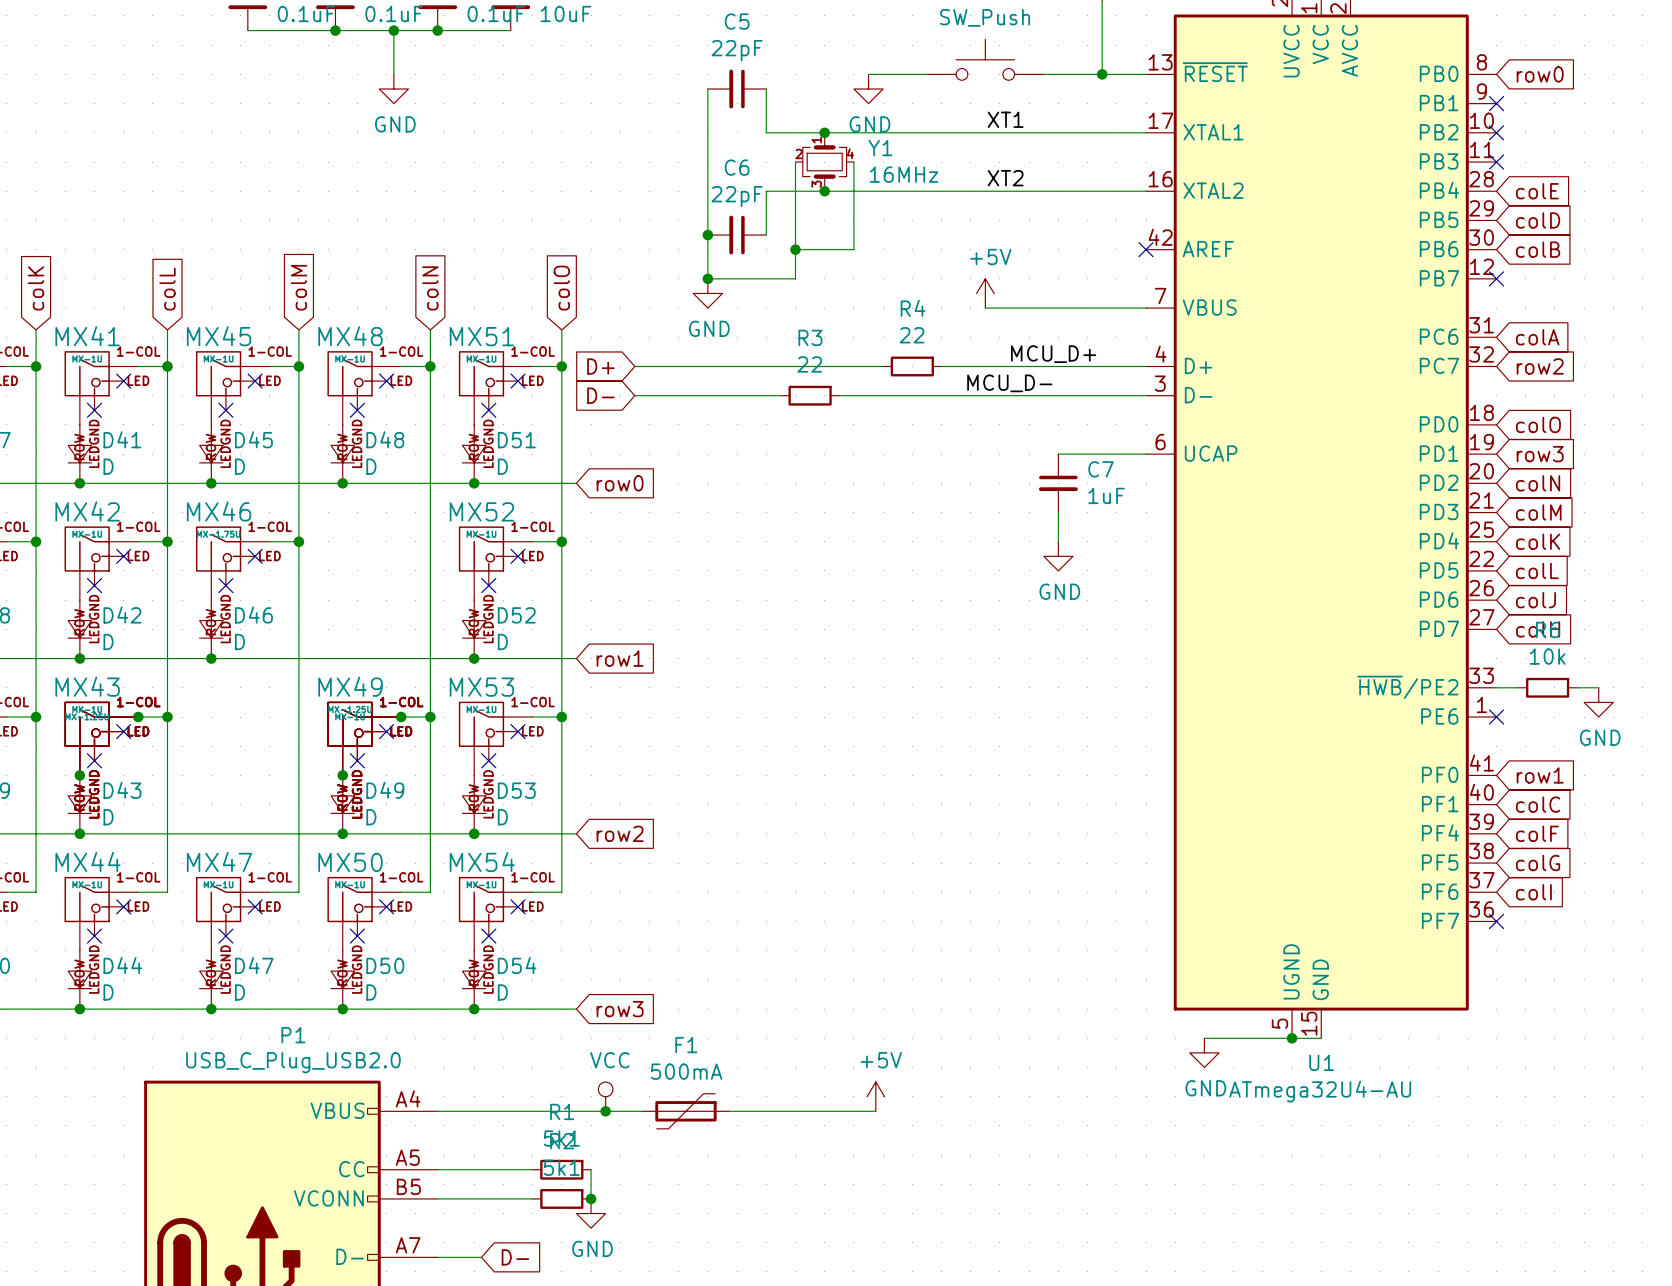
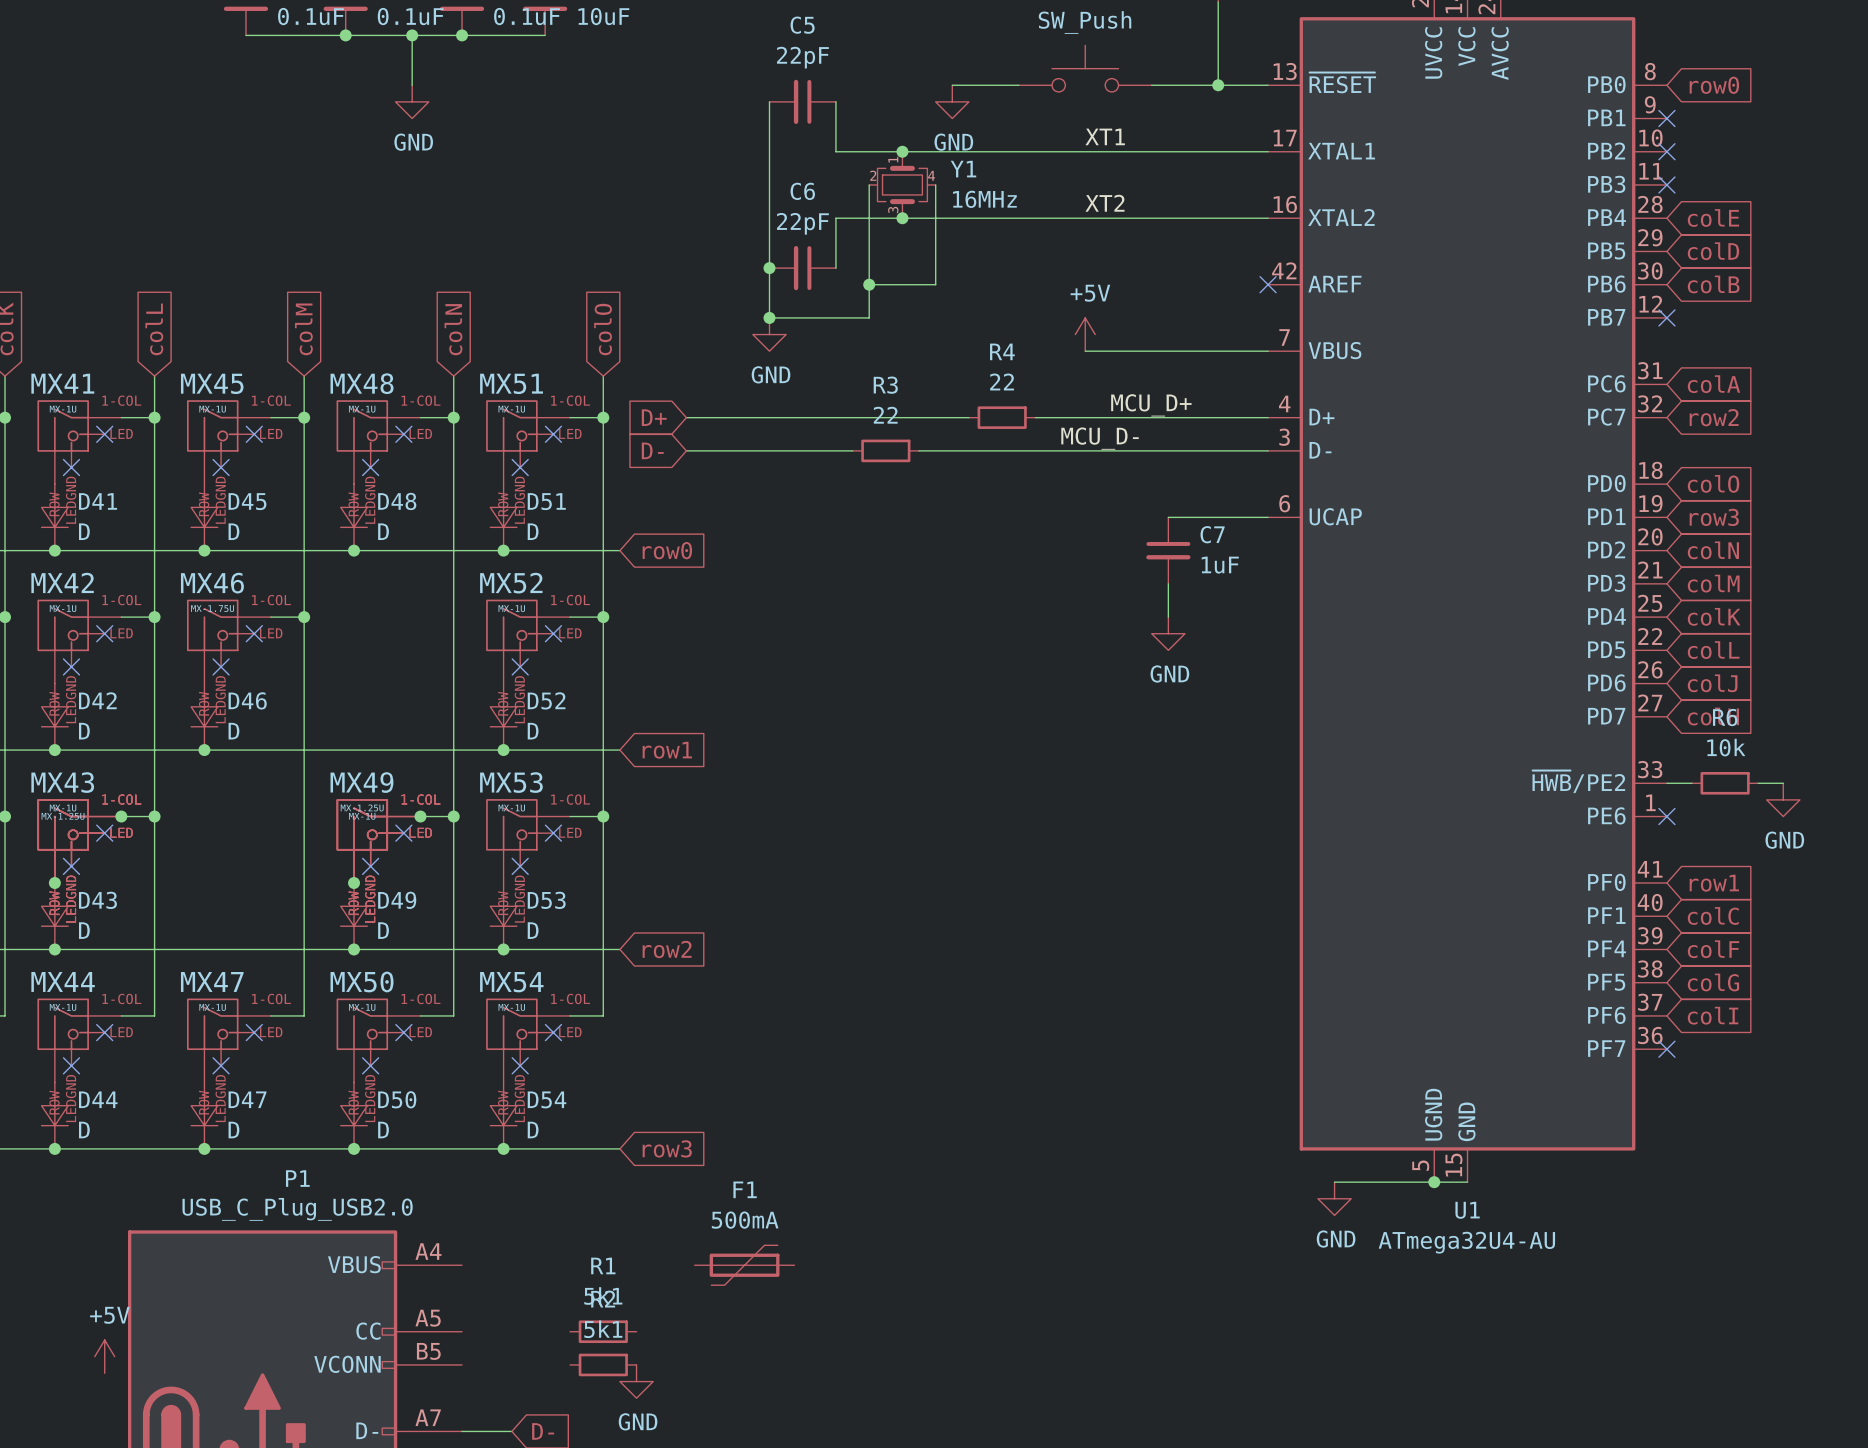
power symbol: VCC (605, 1096) -> none
power symbol: +5V (875, 1096) -> none
wire: (437, 1111) (642, 1111) -> none
junction: (605, 1111) -> none
wire: (729, 1111) (875, 1111) -> none
wire: (437, 1169) (532, 1169) -> none
wire: (591, 1169) (591, 1198) -> none
power symbol: none -> +5V (104, 1356)
wire: (437, 1198) (532, 1198) -> none
junction: (591, 1198) -> none

